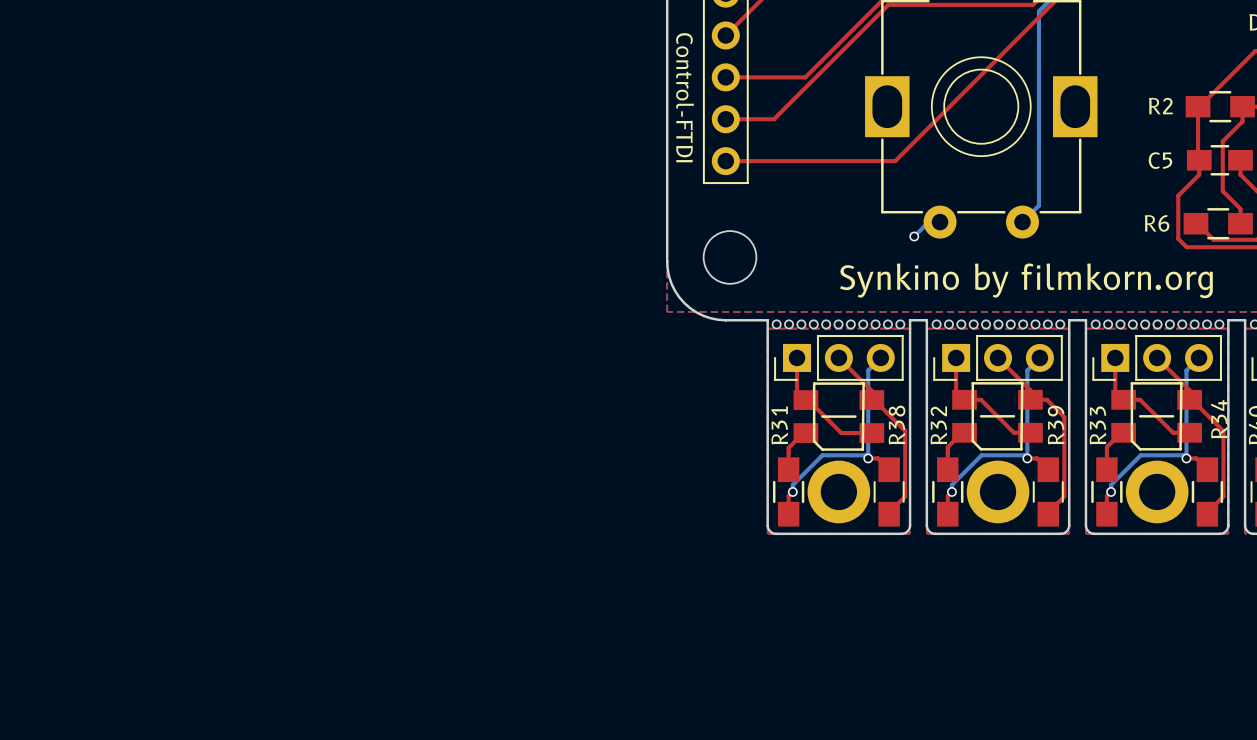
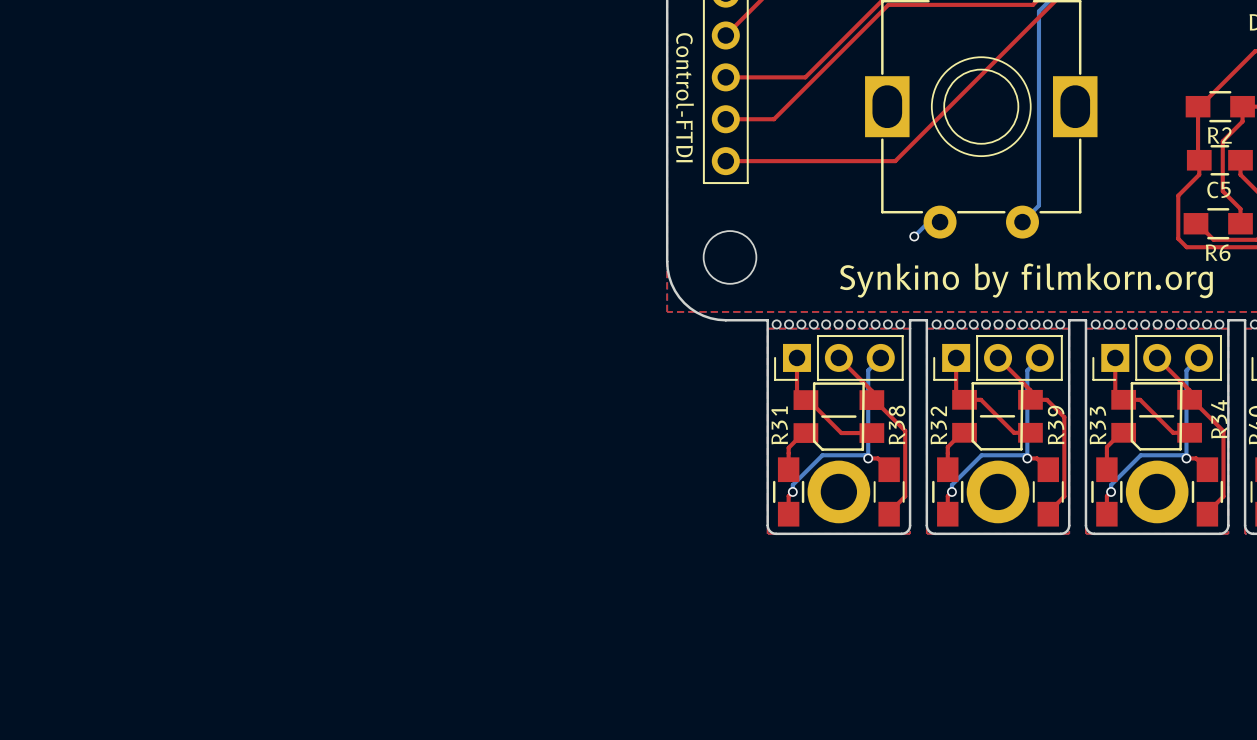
R2 name position: R2 (1160, 106) -> R2 (1219, 135)
C5 name position: C5 (1160, 160) -> C5 (1219, 189)
R6 name position: R6 (1157, 223) -> R6 (1218, 252)

